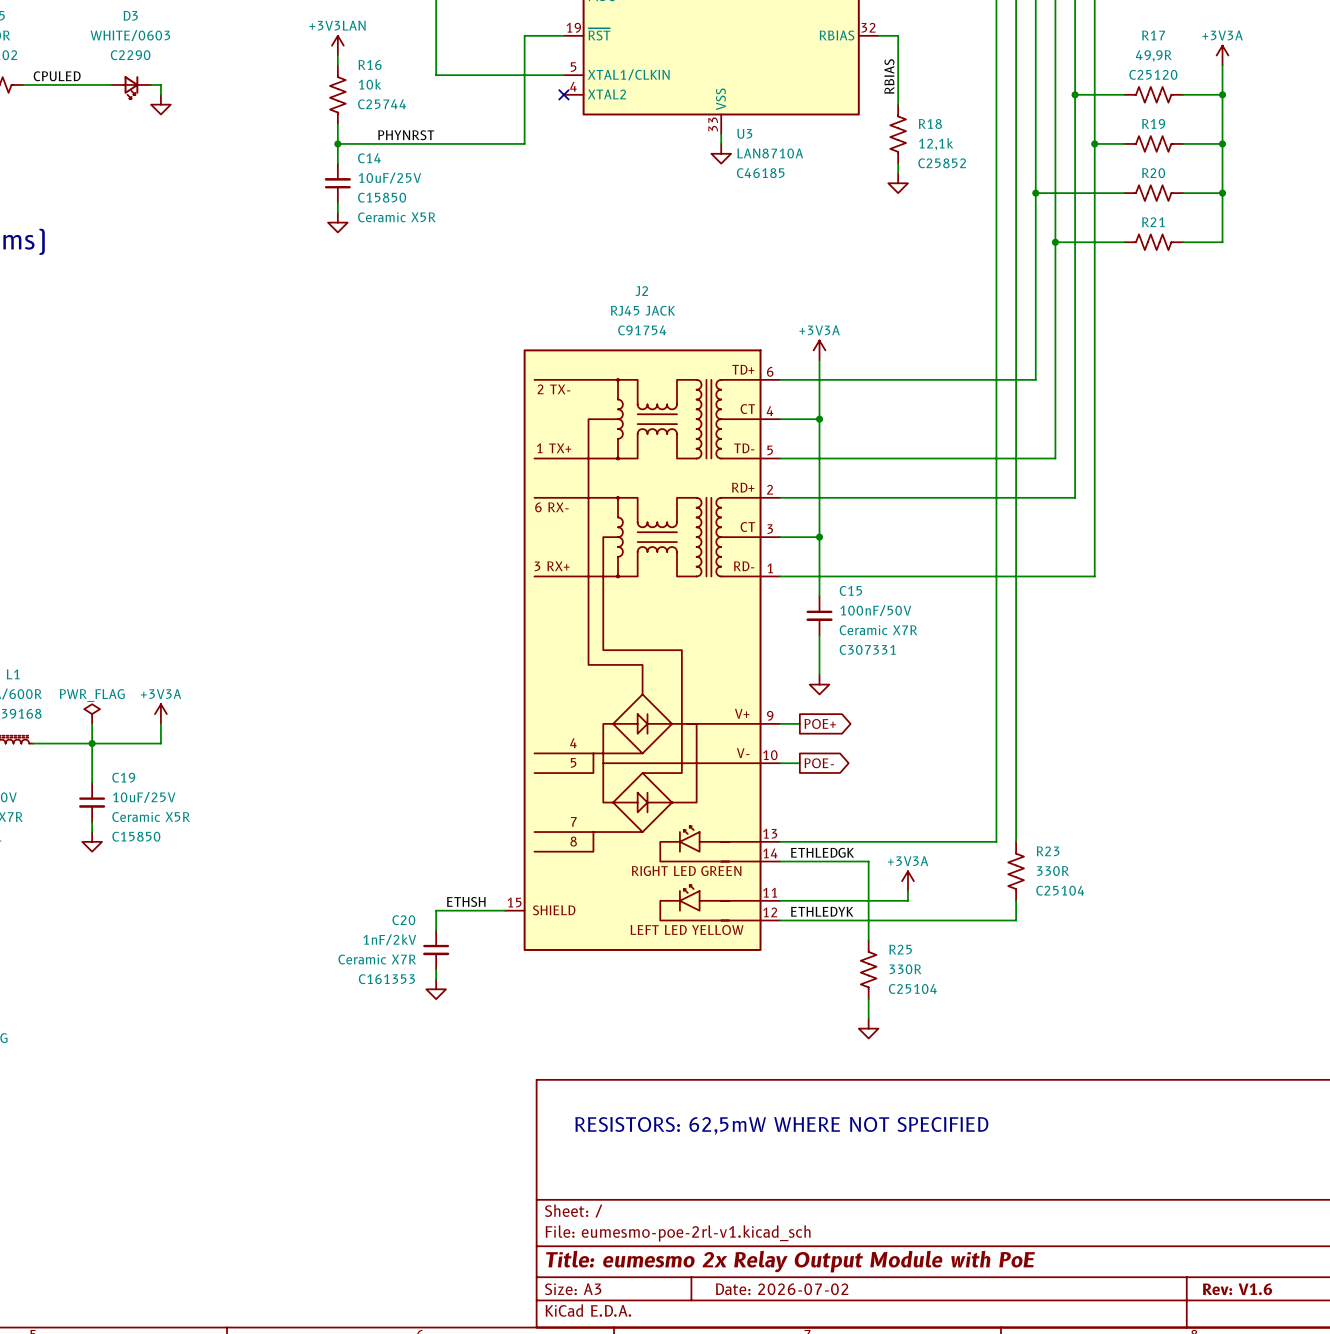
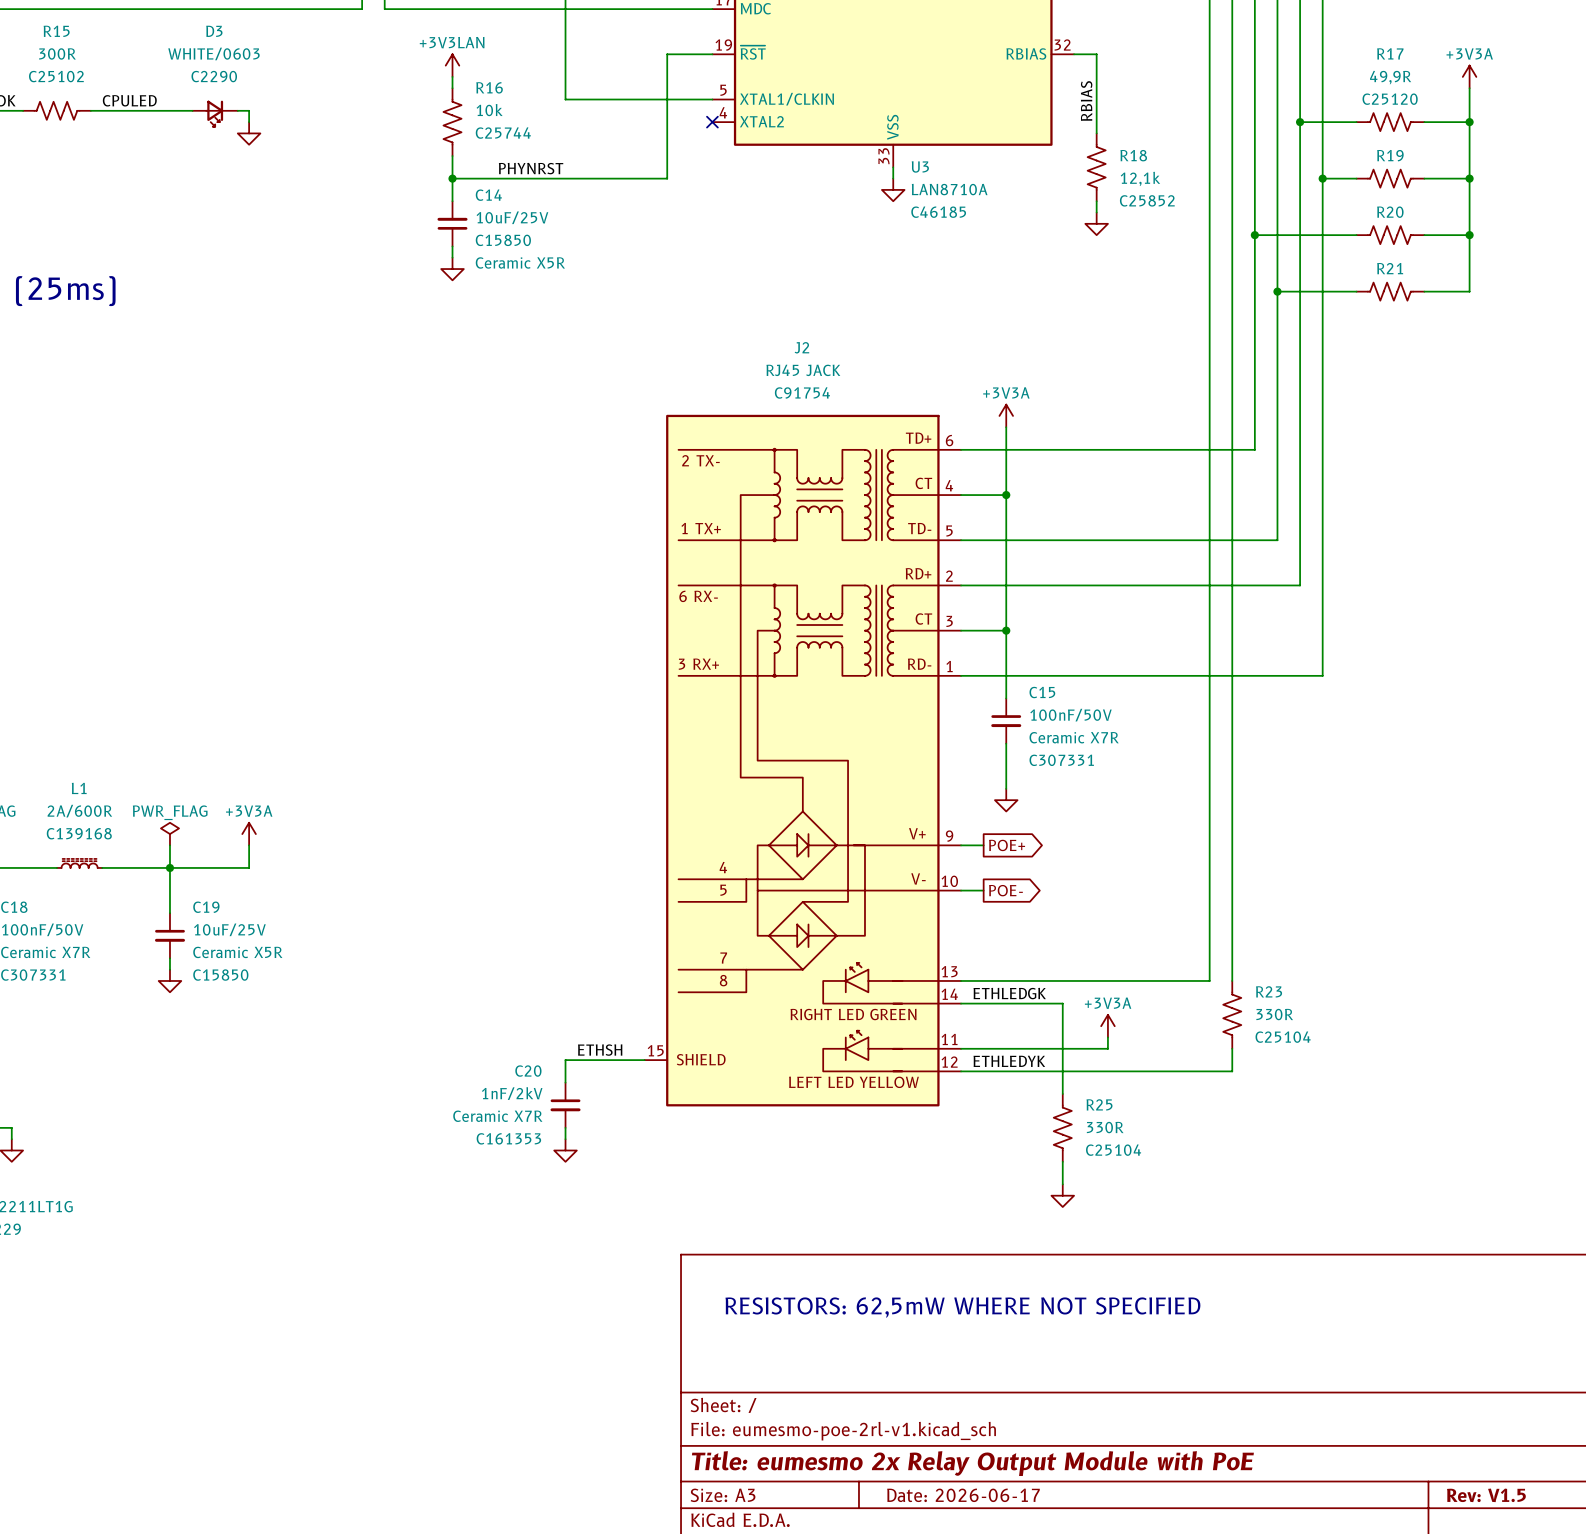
title block: Date: 2026-07-02 (782, 1289) -> Date: 2026-06-17 (963, 1495)
title block: Rev: V1.6 (1237, 1289) -> Rev: V1.5 (1486, 1495)

